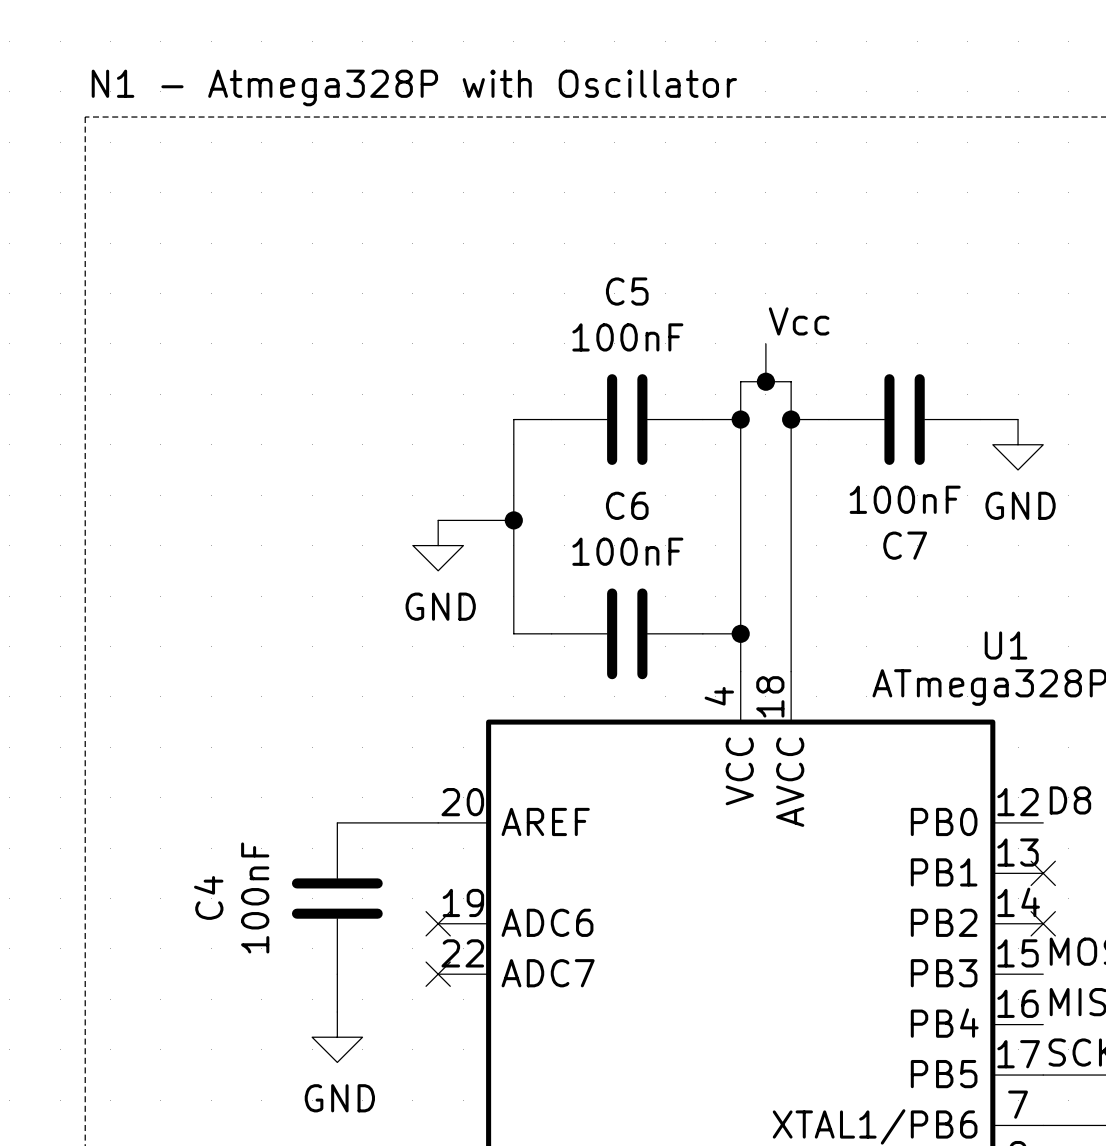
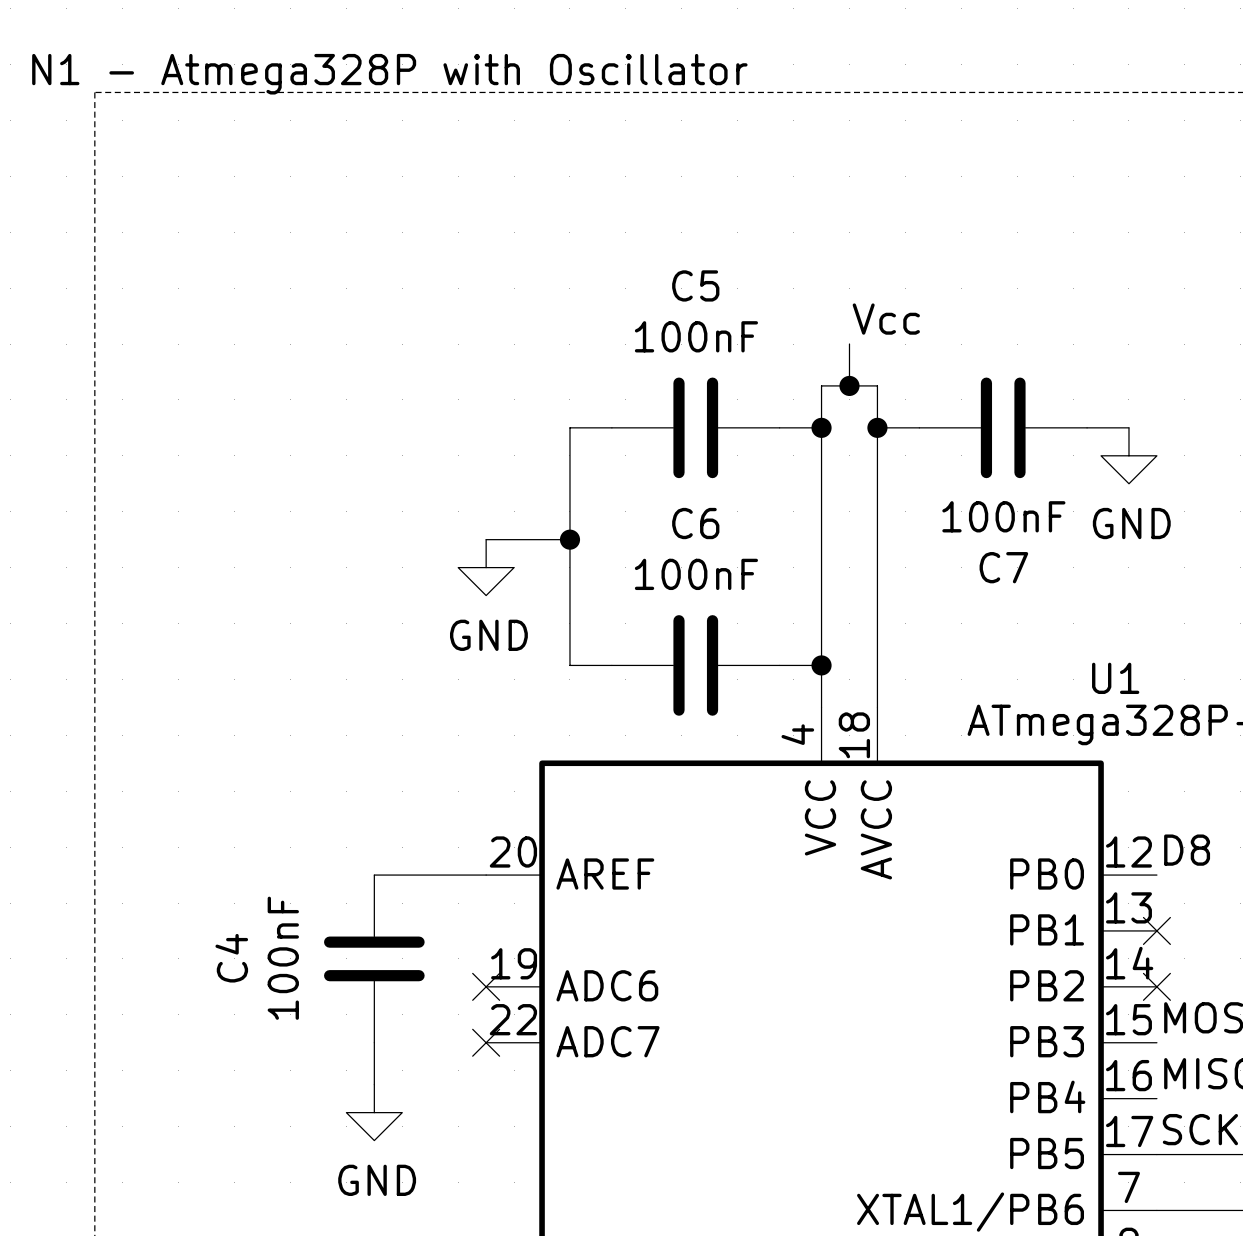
text position: N1 - Atmega328P with Oscillator (414, 87) -> N1 - Atmega328P with Oscillator (389, 74)

